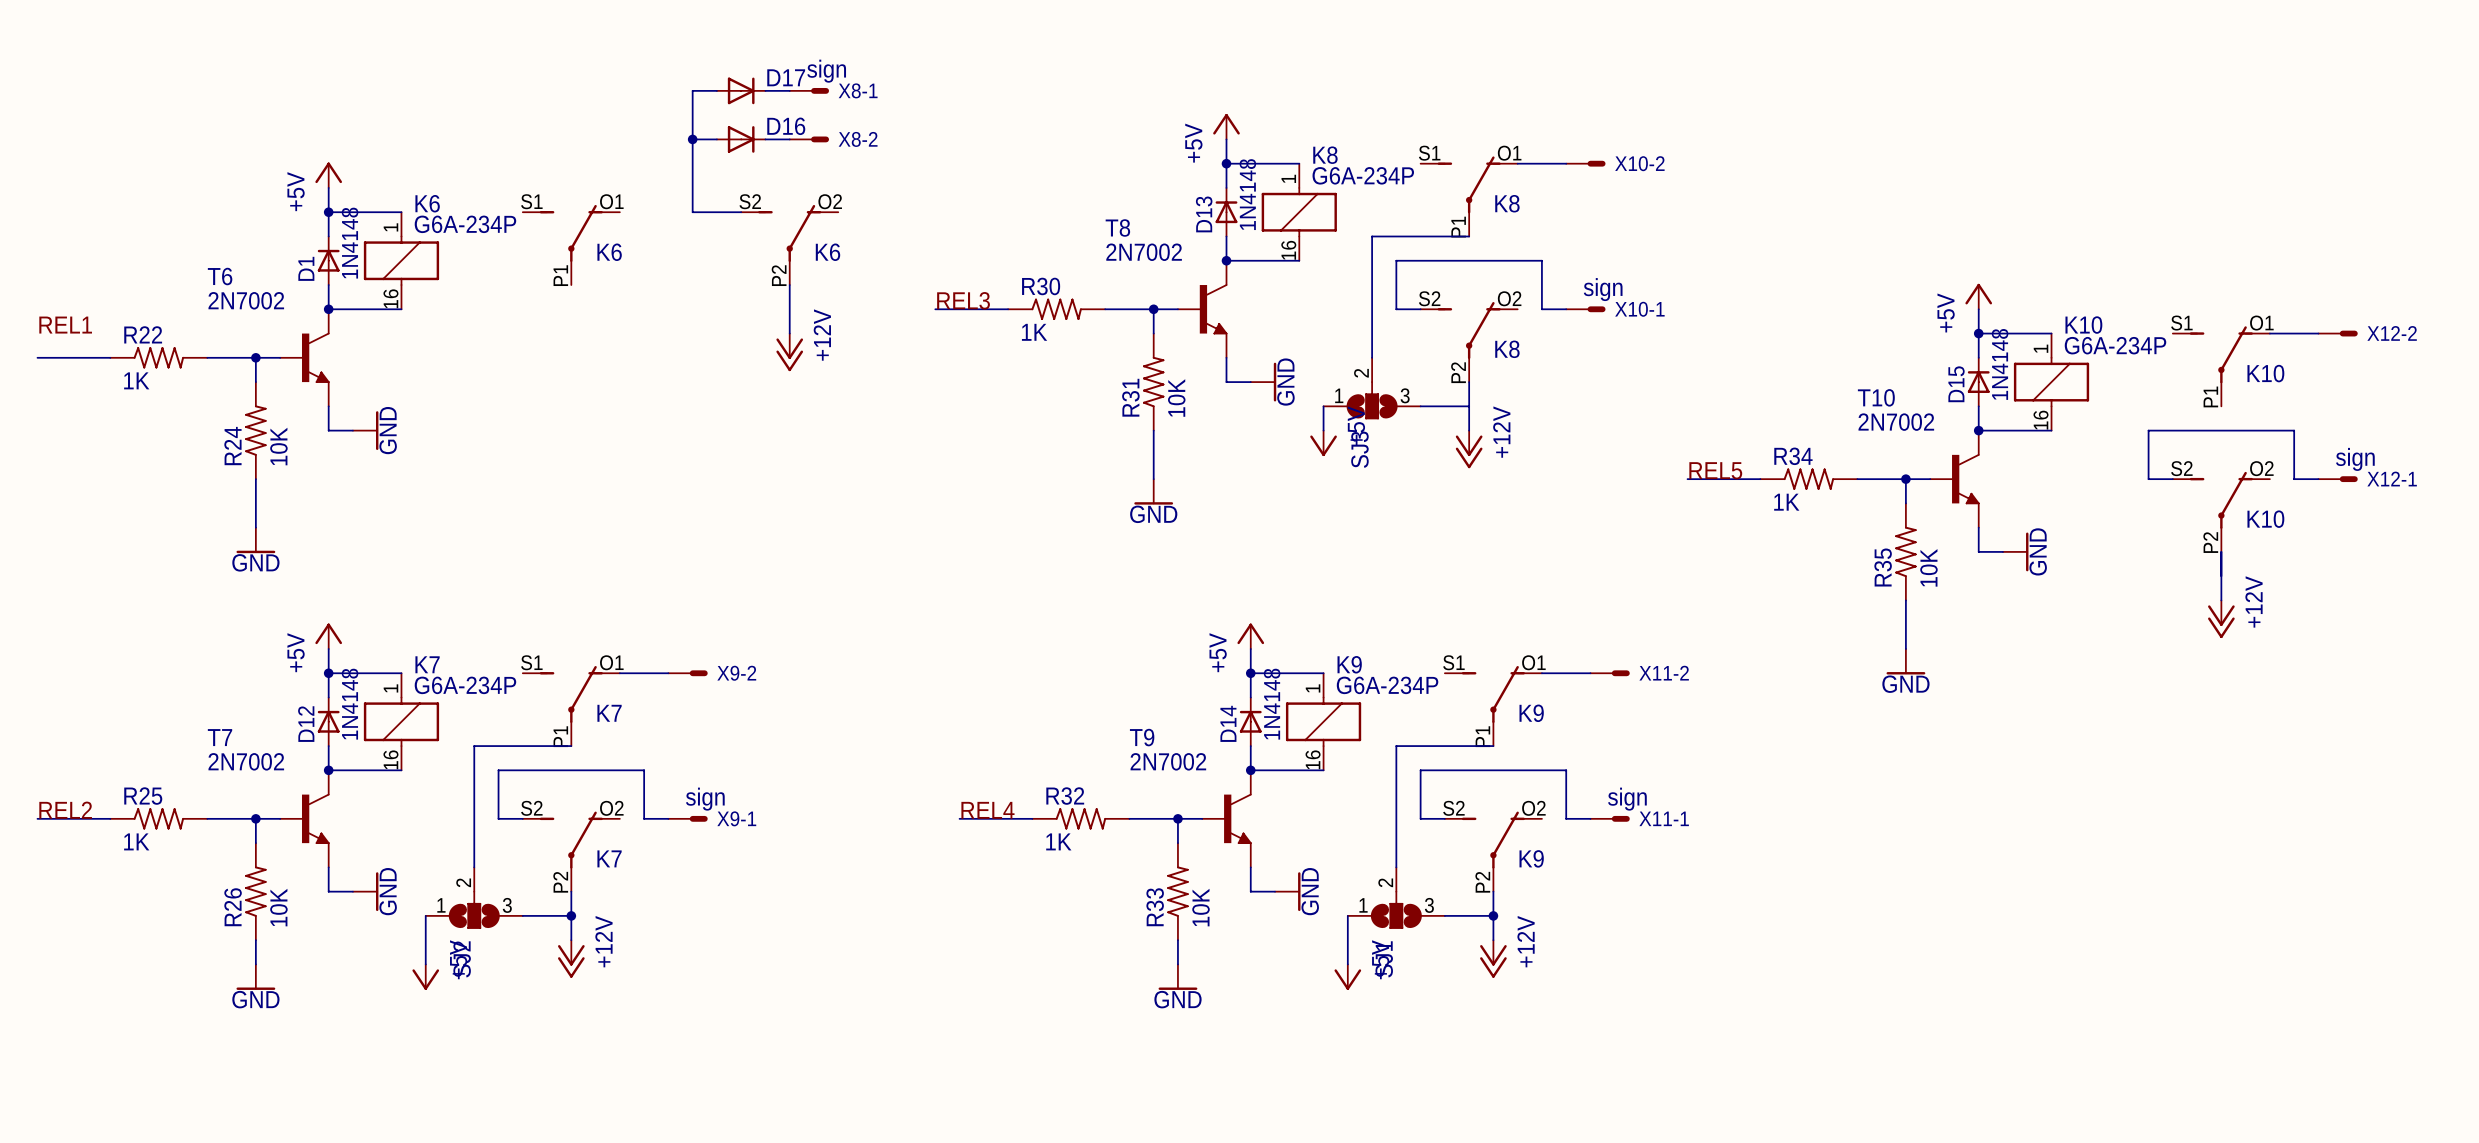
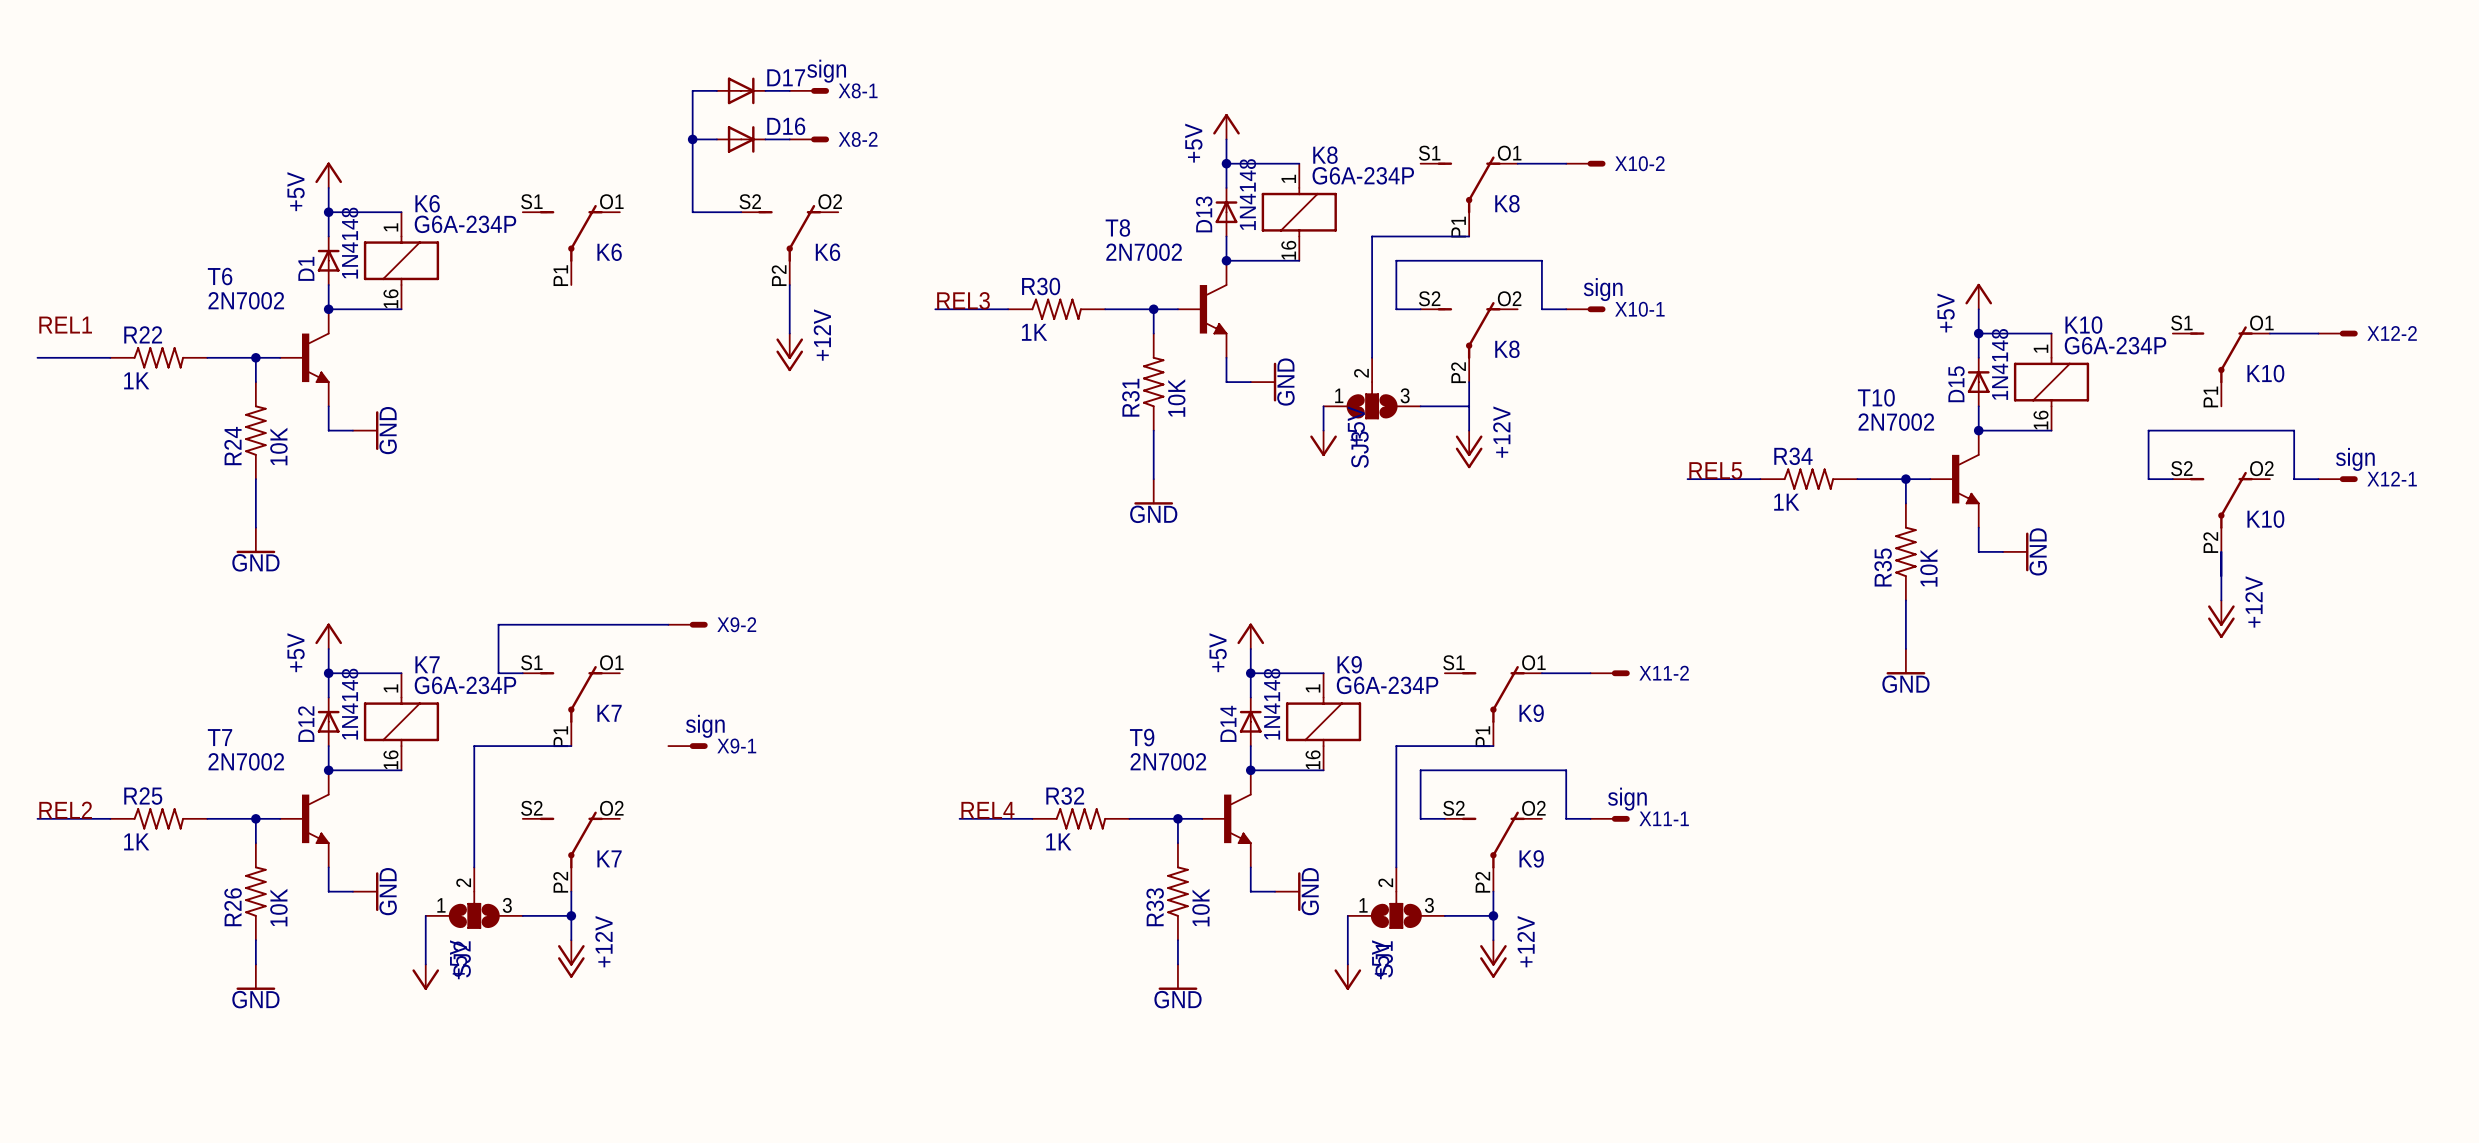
wire: none -> (668, 624) (498, 624) (498, 673) (522, 673)
wire: (619, 673) (668, 673) -> none
X9-2 position: (688, 673) -> (688, 624)
wire: (522, 818) (498, 818) (498, 770) (644, 770) (644, 818) (668, 818) -> none
X9-1 position: (688, 818) -> (688, 746)

